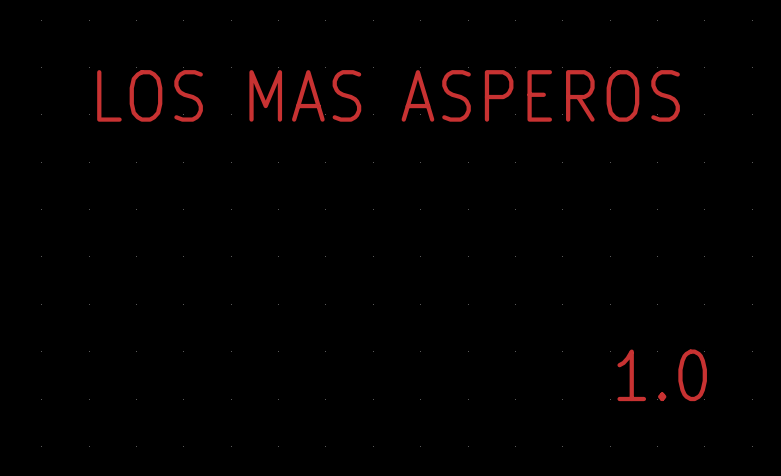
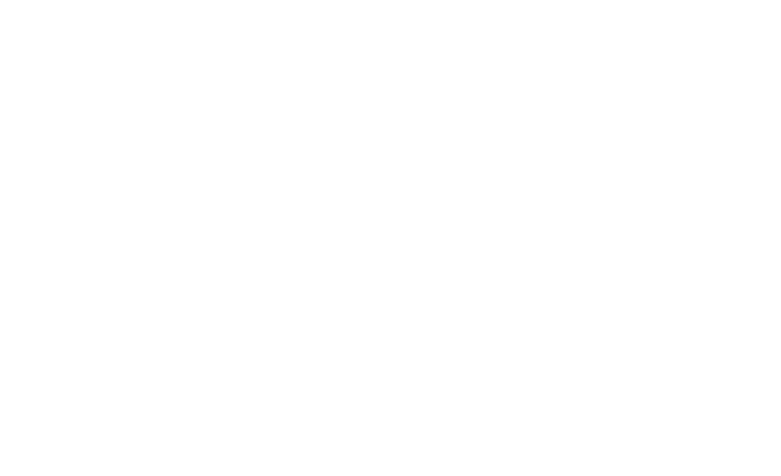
text: LOS MAS ASPEROS (388, 95) -> none
text: 1.0 (662, 375) -> none

